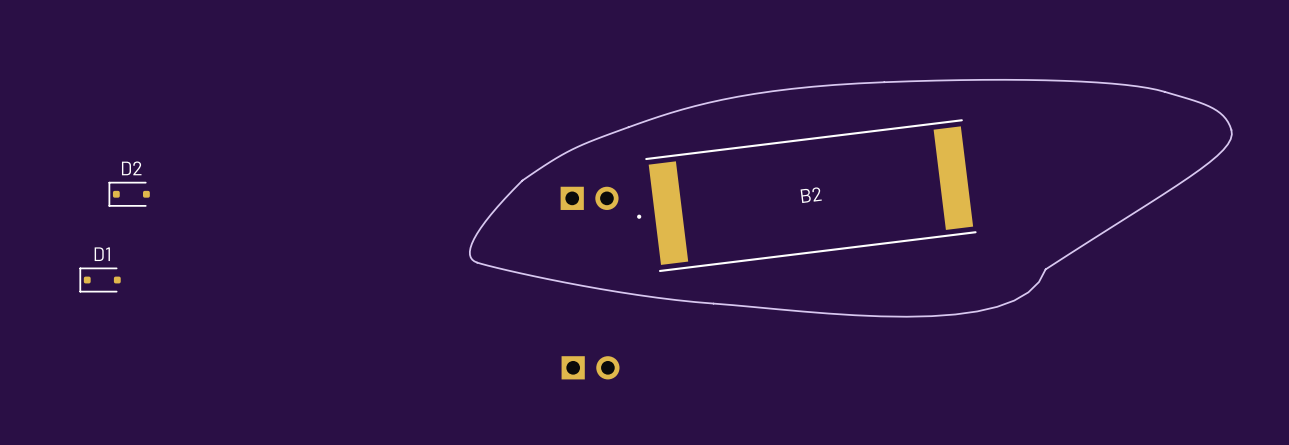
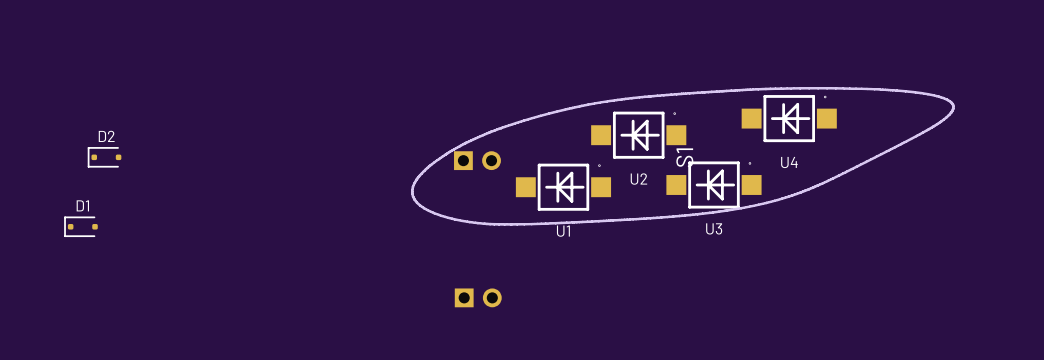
board edge: (884, 82) (791, 88) (722, 99) (659, 116) (583, 144) (556, 158) (522, 180) (480, 227) (471, 243) (470, 257) (481, 263) (548, 279) (676, 300) (880, 316) (931, 316) (977, 311) (1014, 300) (1028, 292) (1038, 282) (1045, 269) (1176, 185) (1209, 162) (1227, 144) (1231, 134) (1225, 118) (1213, 108) (1164, 91) (1137, 86) (1081, 81) (1025, 79) (884, 82) -> none
U4: none -> (789, 118)
U2: none -> (638, 135)
S1: none -> (682, 156)
B2: (806, 195) -> none
U3: none -> (713, 184)
U1: none -> (563, 187)

